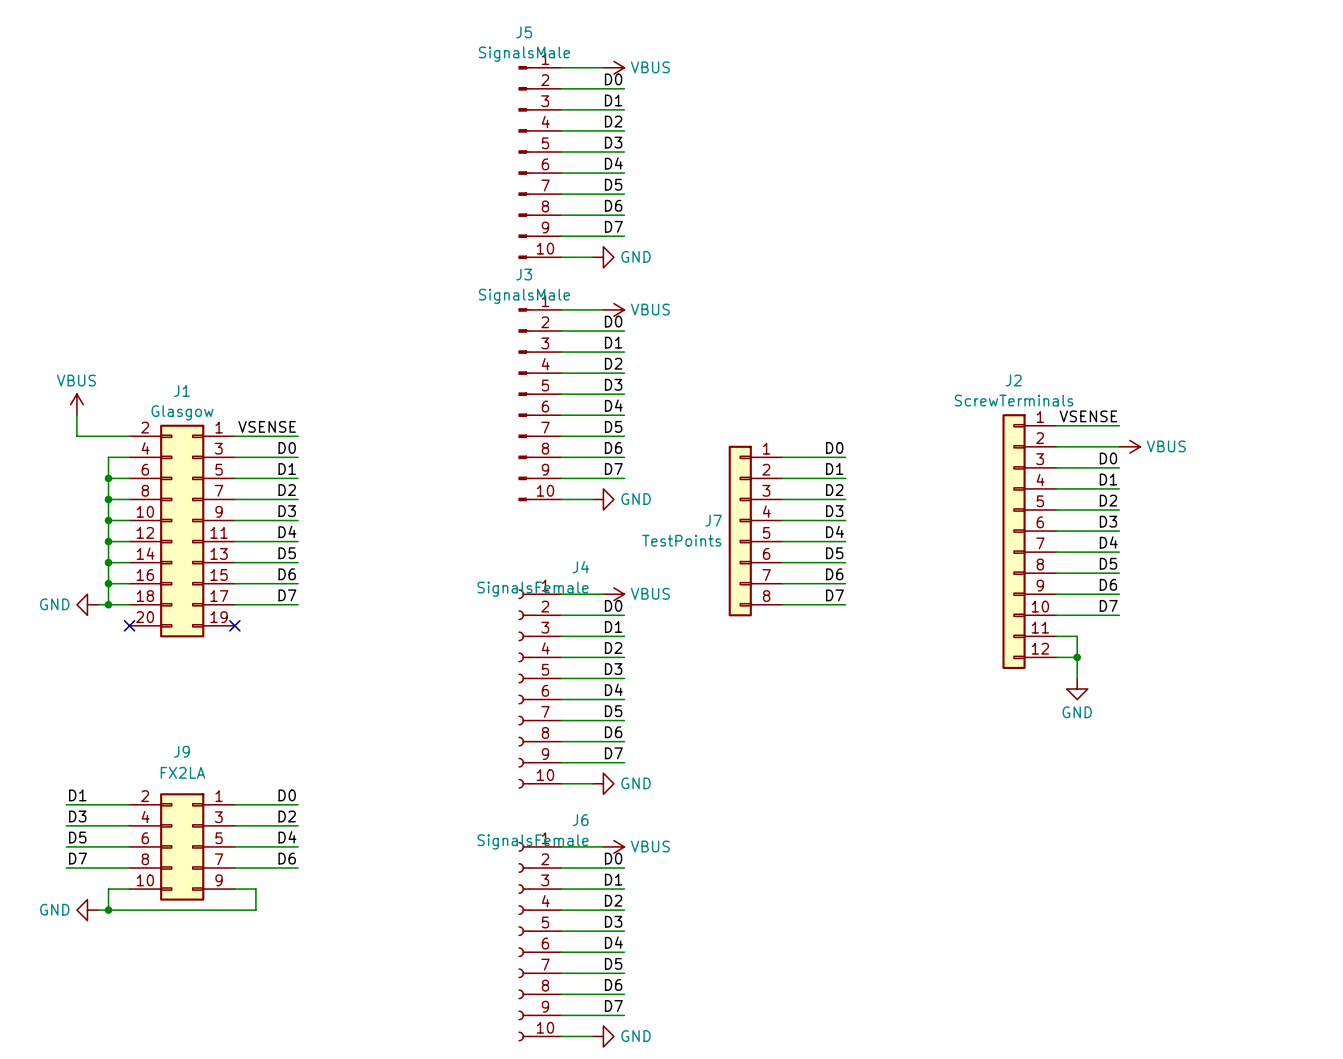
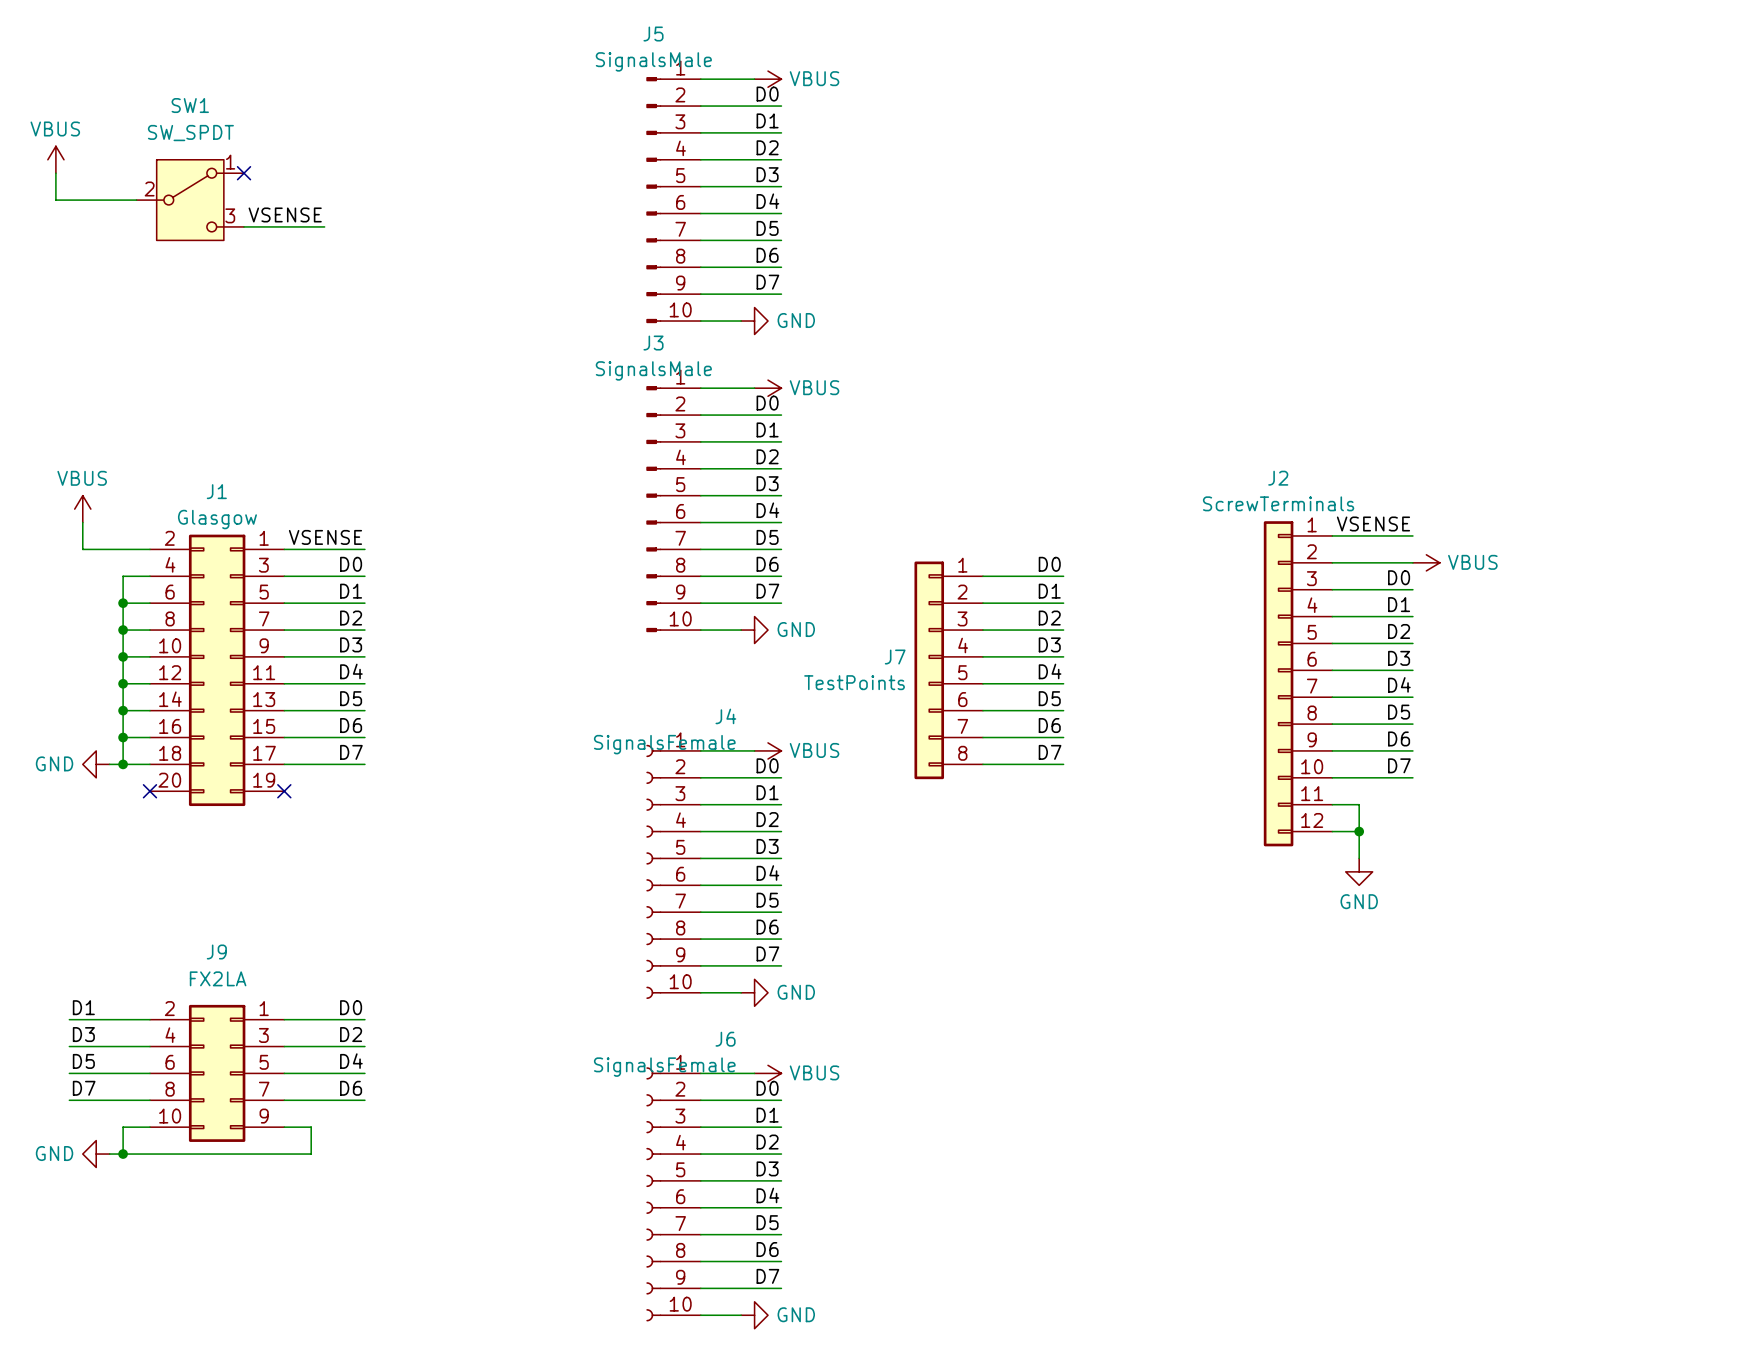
power symbol: none -> VBUS (55, 159)
wire: none -> (55, 173) (55, 200) (136, 200)
no-connect mark: none -> (244, 173)
SW1: none -> SW_SPDT (190, 200)
label: none -> VSENSE (285, 214)
wire: none -> (244, 226) (324, 226)

